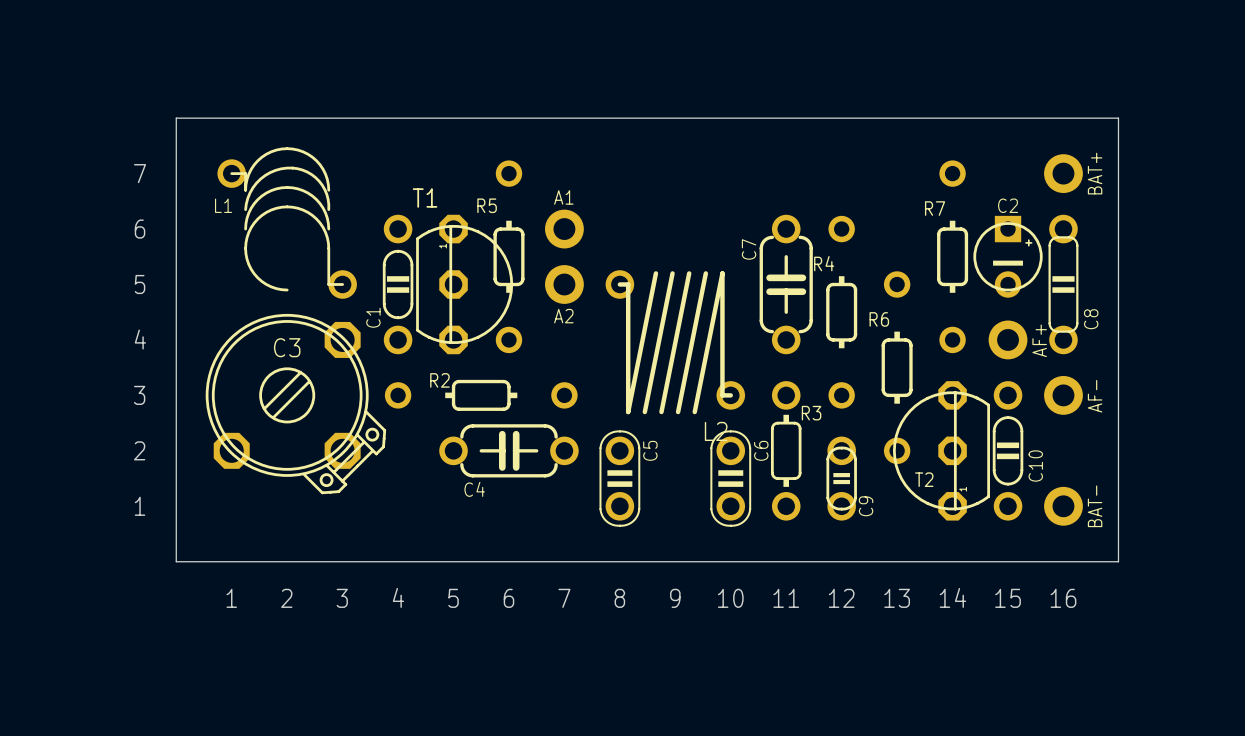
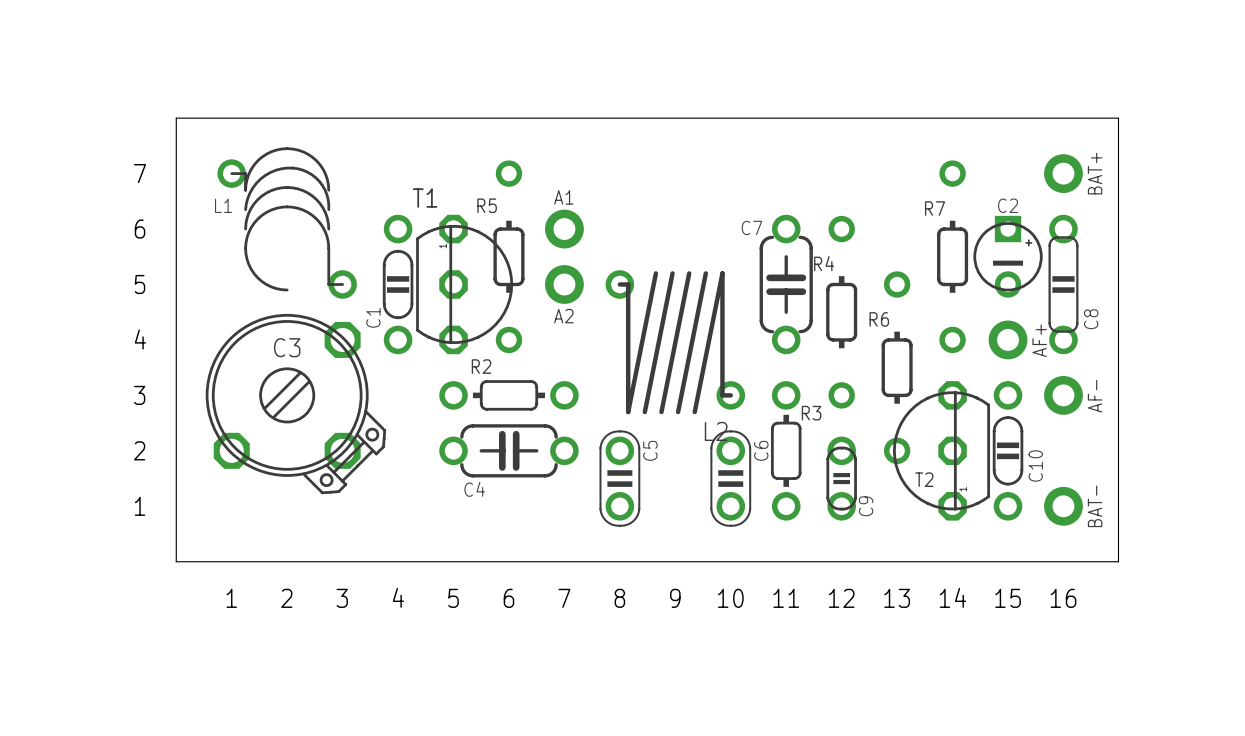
C7 name rotation: 0° (749, 249) -> 90° clockwise (751, 227)
R2 footprint: [384, 379, 578, 411] -> [439, 380, 579, 411]

